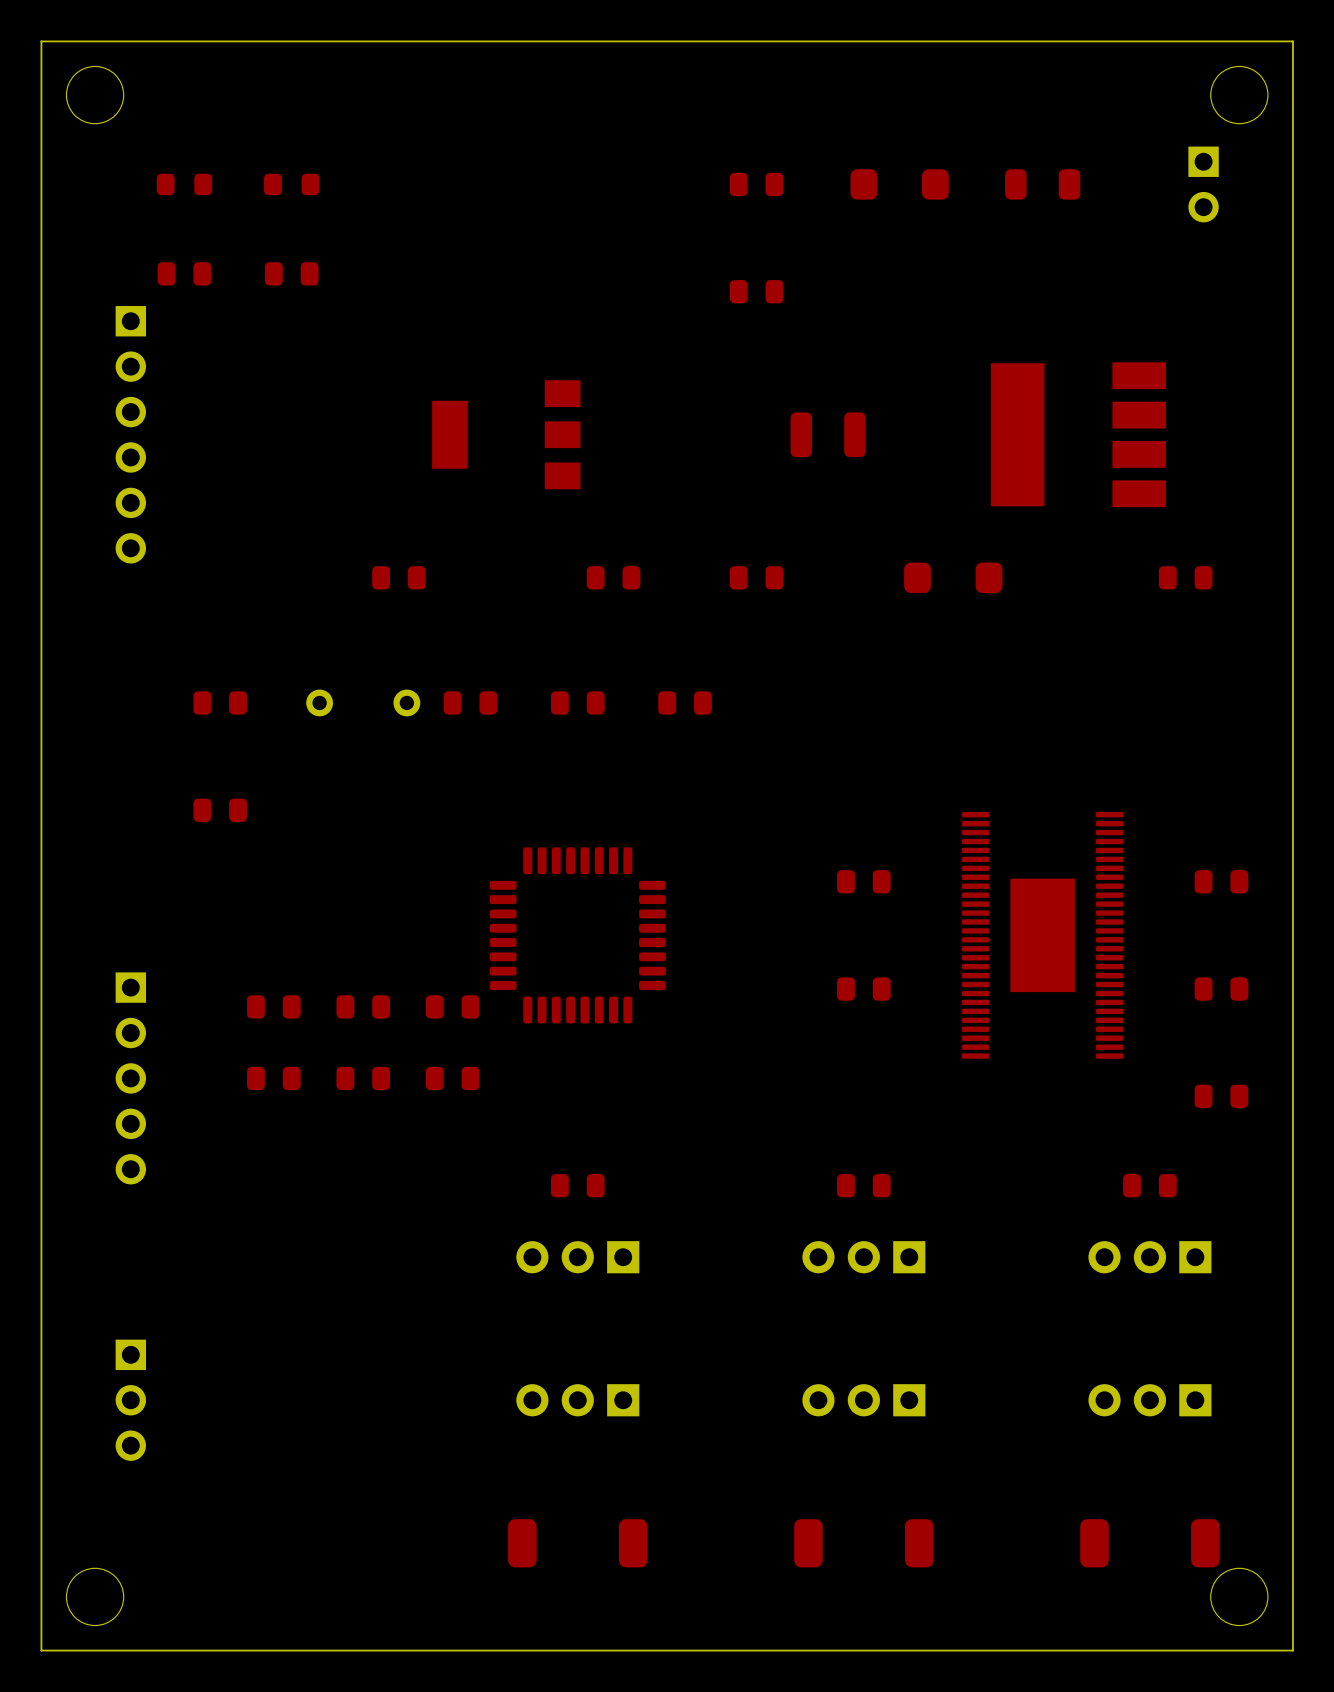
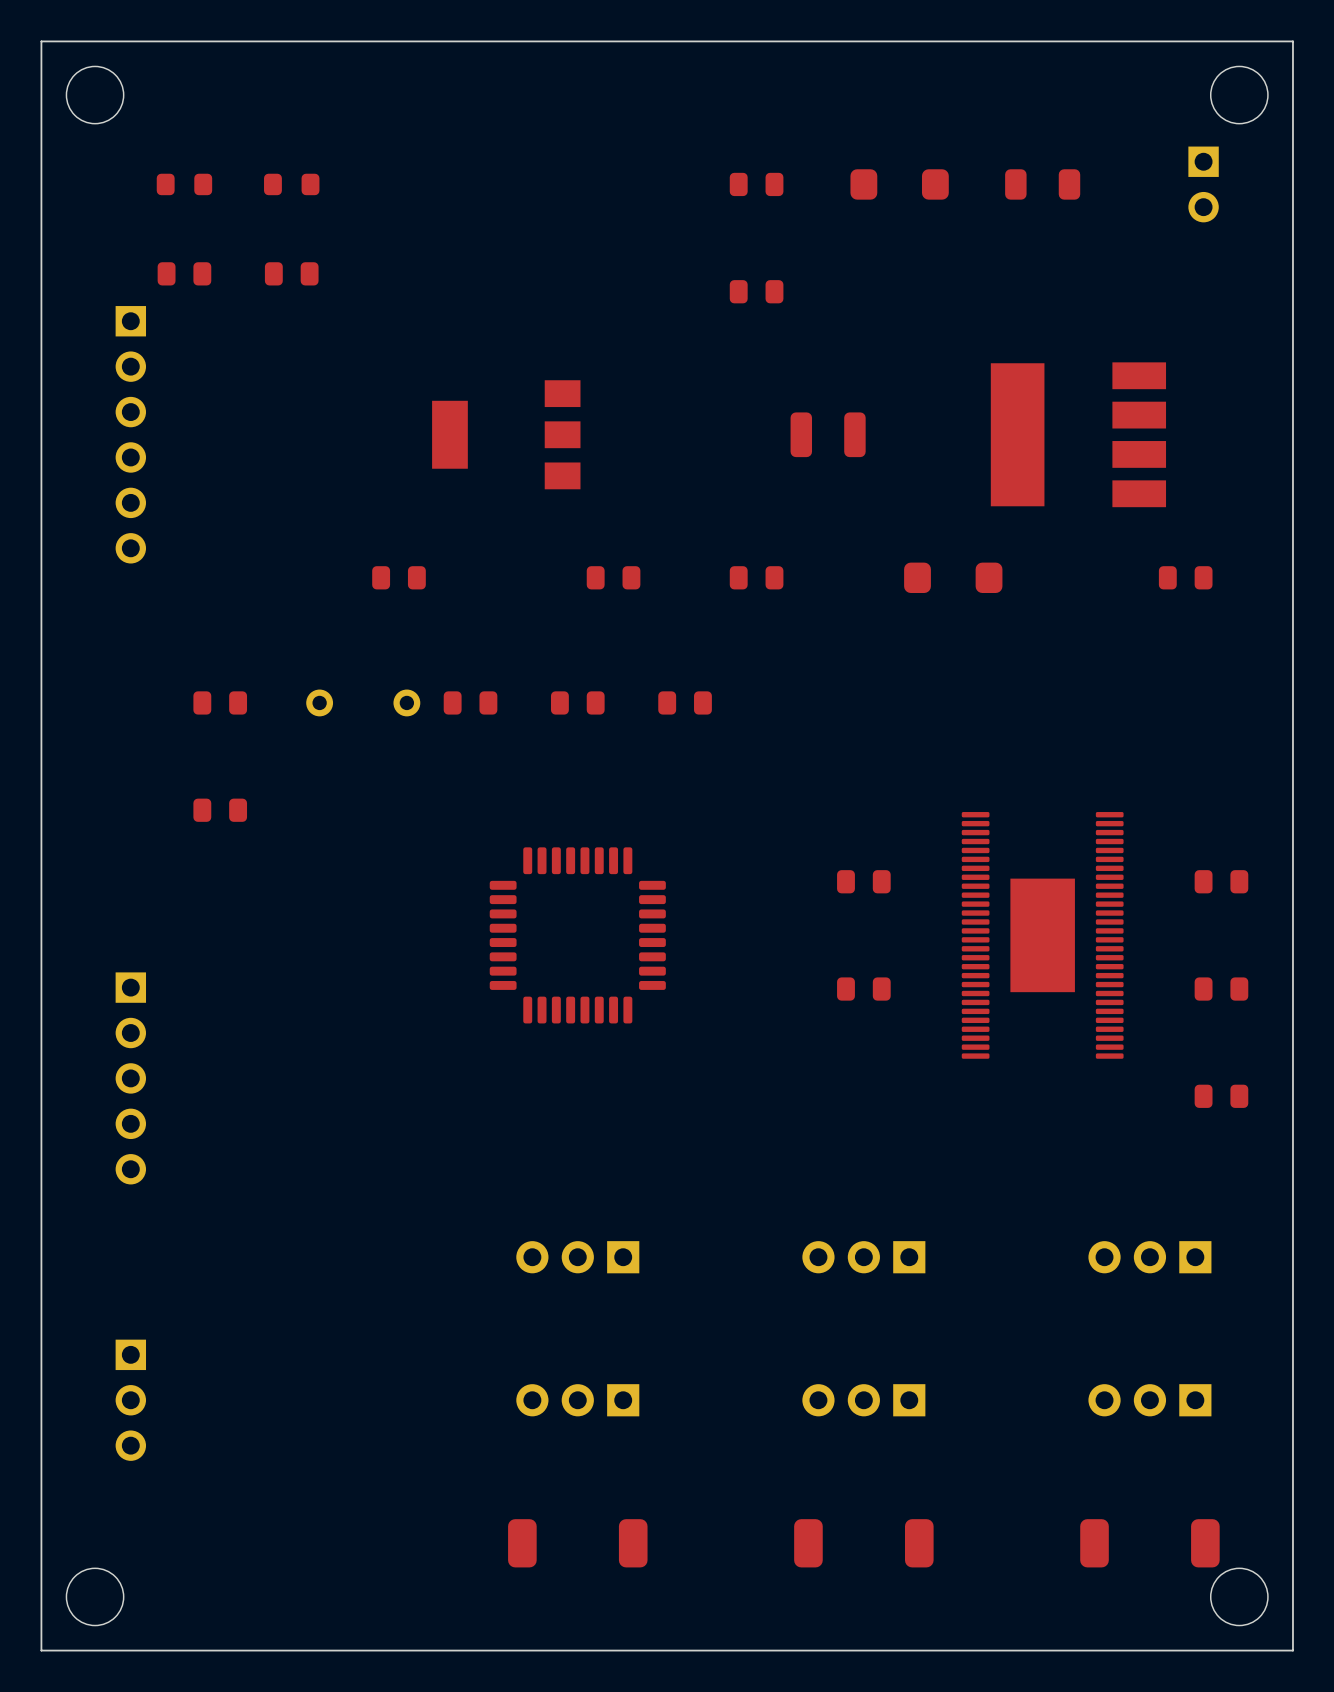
part: (273, 1006) -> none
part: (363, 1006) -> none
part: (452, 1006) -> none
part: (273, 1078) -> none
part: (363, 1078) -> none
part: (452, 1078) -> none
part: (577, 1185) -> none
part: (863, 1185) -> none
part: (1149, 1185) -> none

